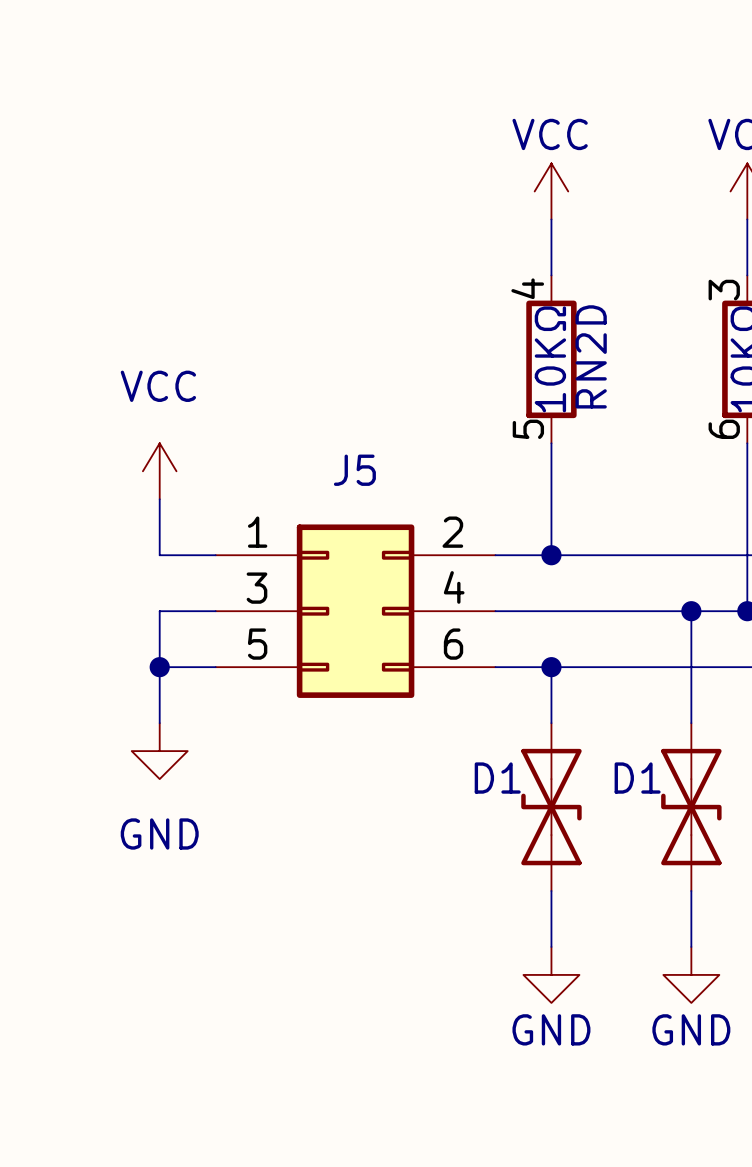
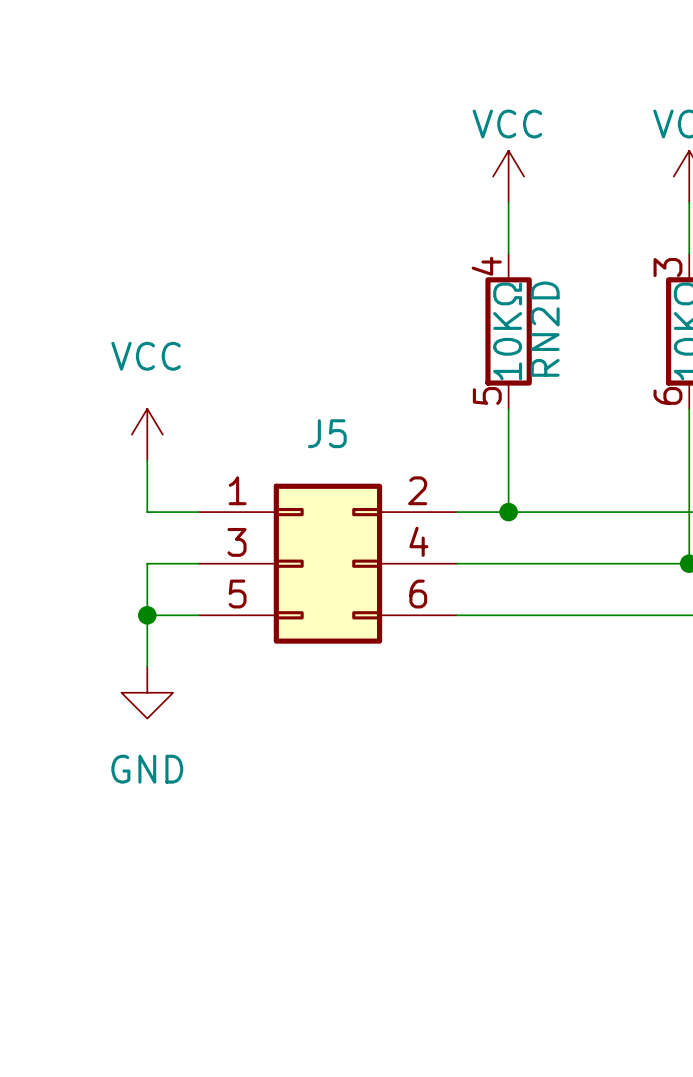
wire: (691, 611) (691, 723) -> none
junction: (691, 611) -> none
wire: (551, 667) (551, 723) -> none
junction: (551, 667) -> none
D1: (551, 807) -> none
D1: (691, 807) -> none
wire: (551, 891) (551, 946) -> none
wire: (691, 891) (691, 946) -> none
power symbol: GND (551, 974) -> none
power symbol: GND (691, 974) -> none

